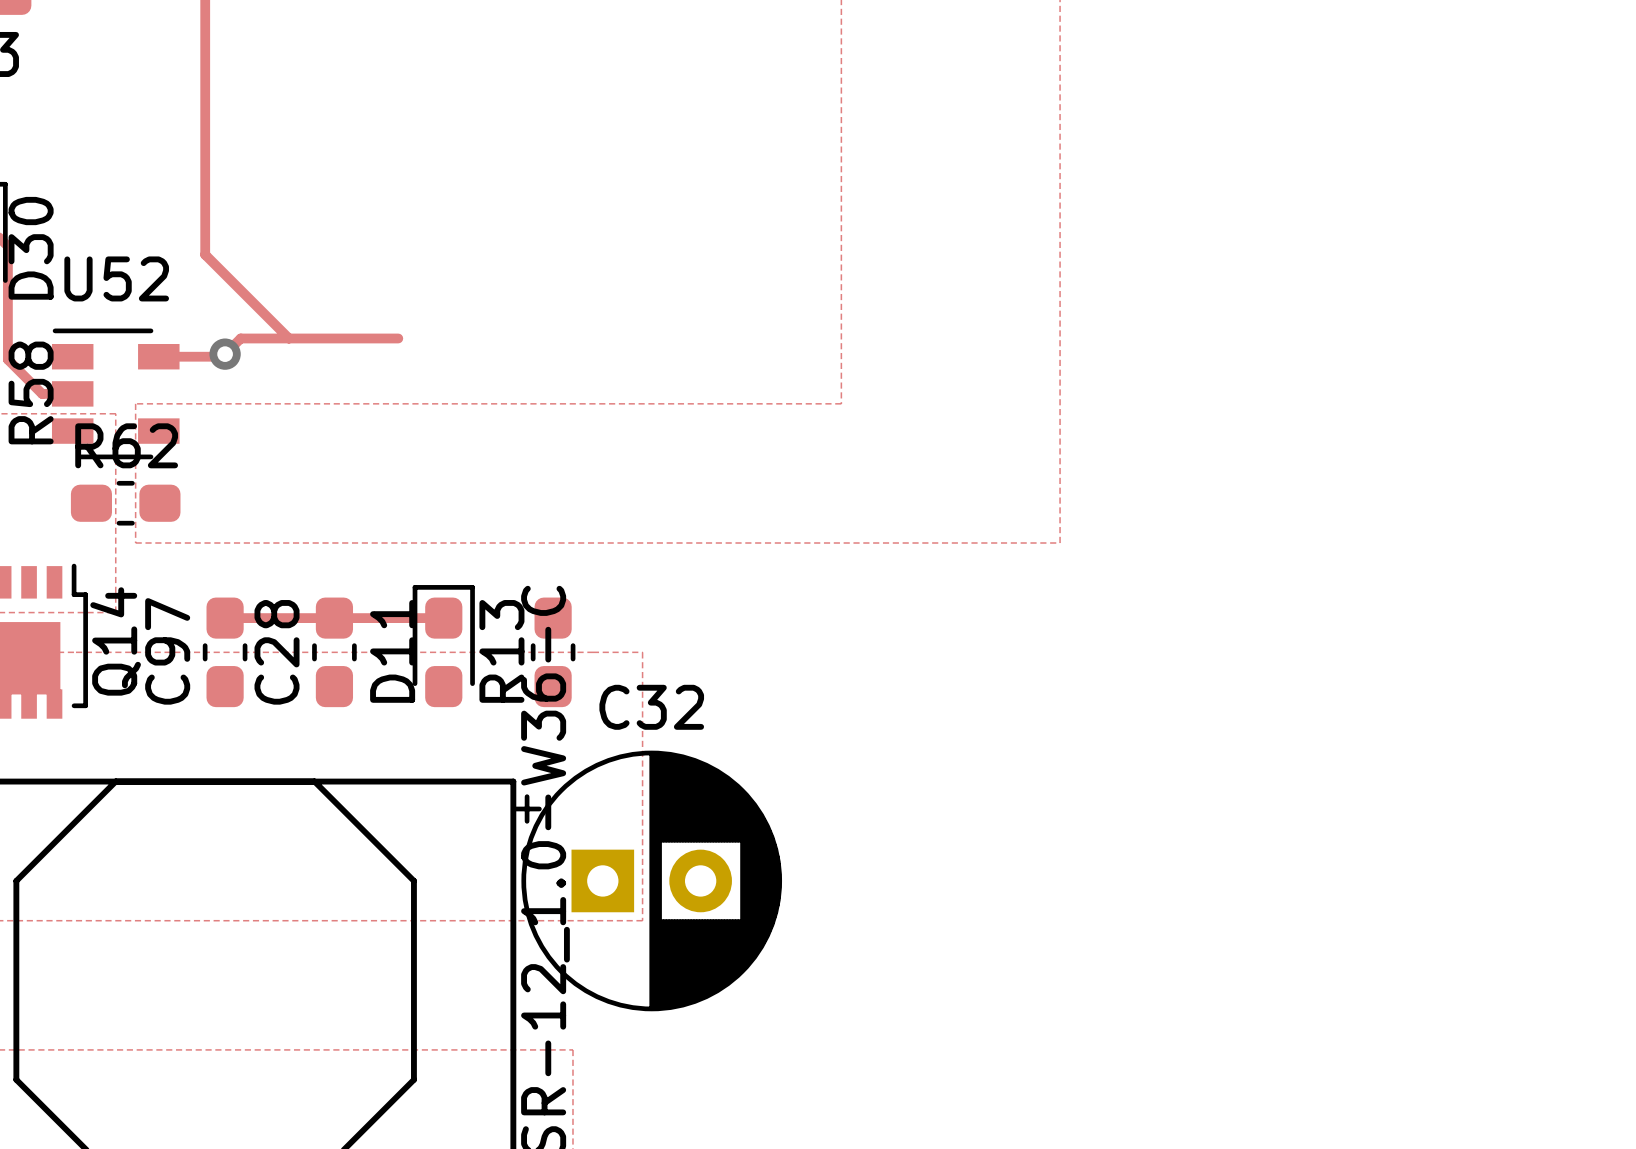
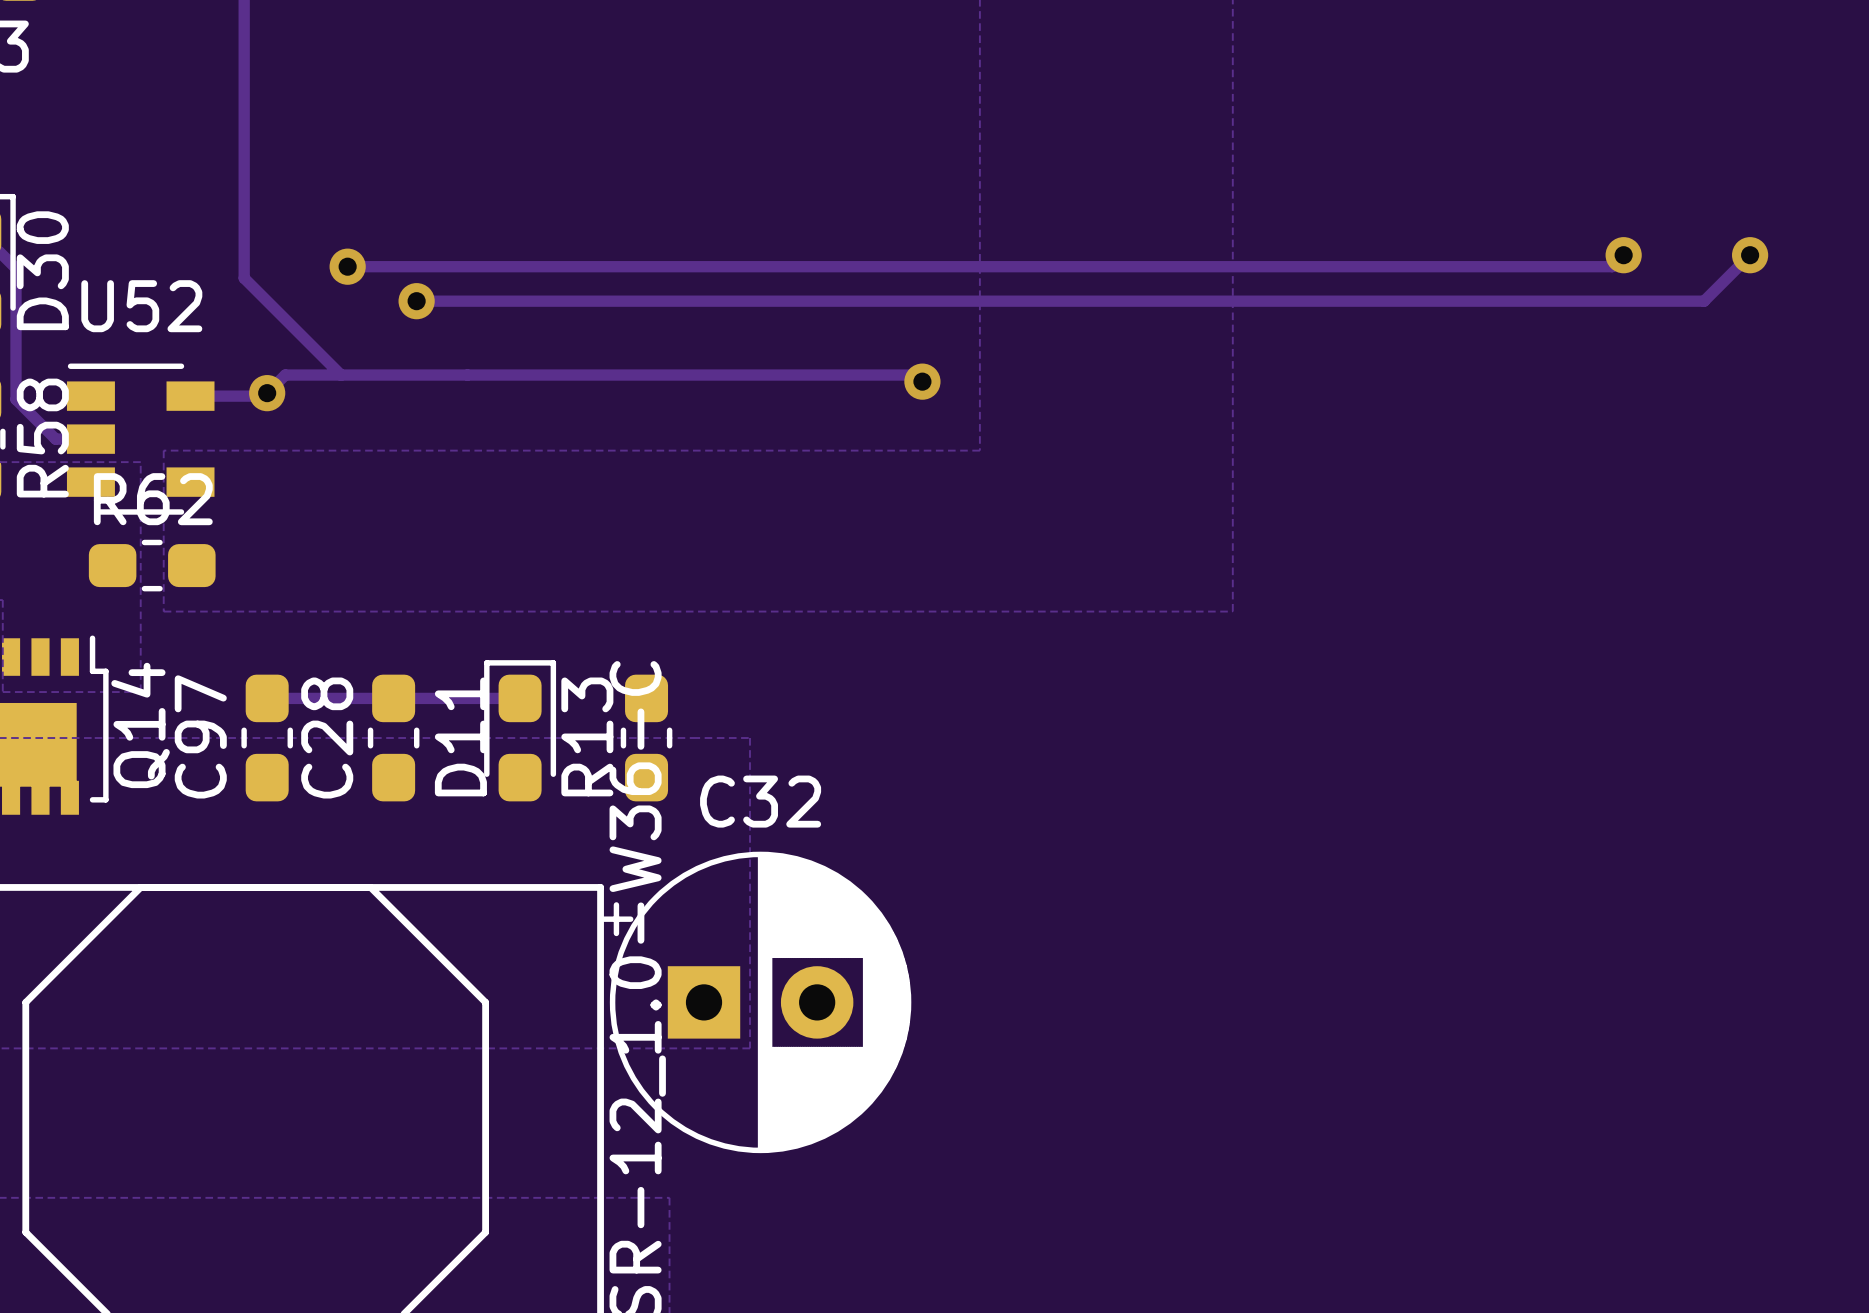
track: none -> (1623, 255) (1612, 266) (347, 266)
via: none -> (1623, 255)
track: none -> (1750, 255) (1704, 301) (416, 301)
via: none -> (1750, 255)
via: none -> (347, 266)
via: none -> (416, 301)
track: none -> (467, 375) (915, 375) (922, 381)
via: none -> (922, 381)

